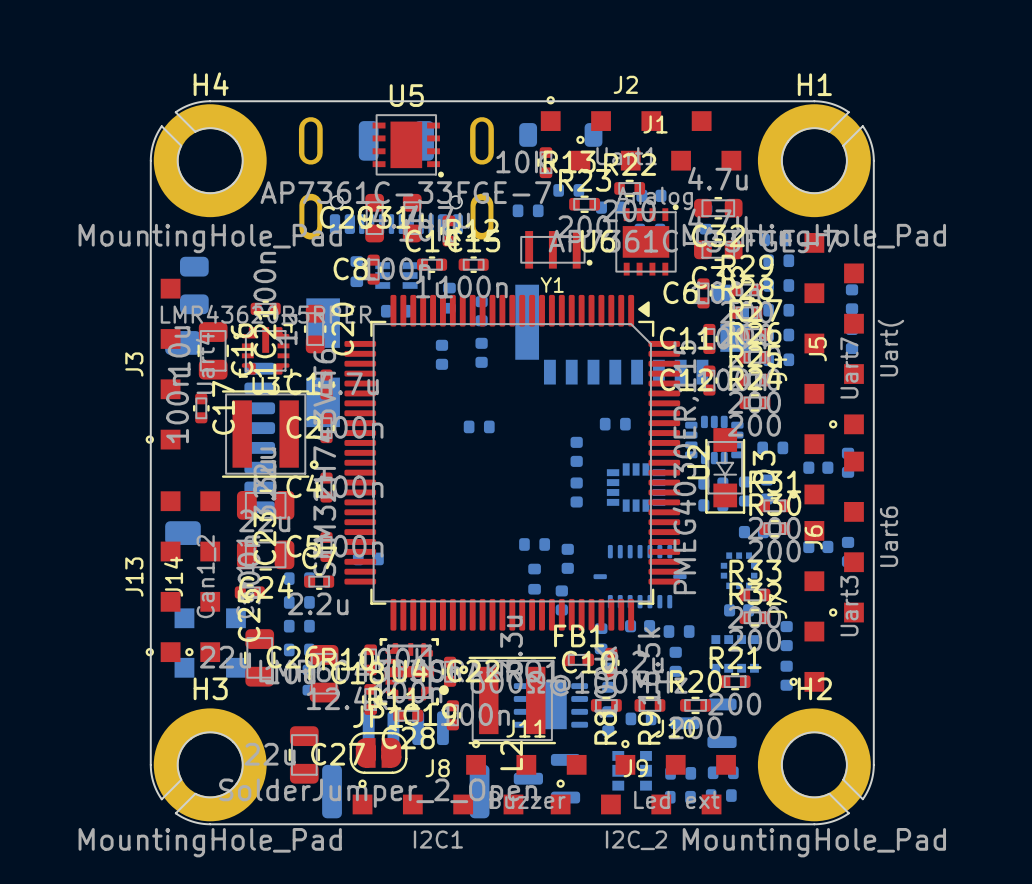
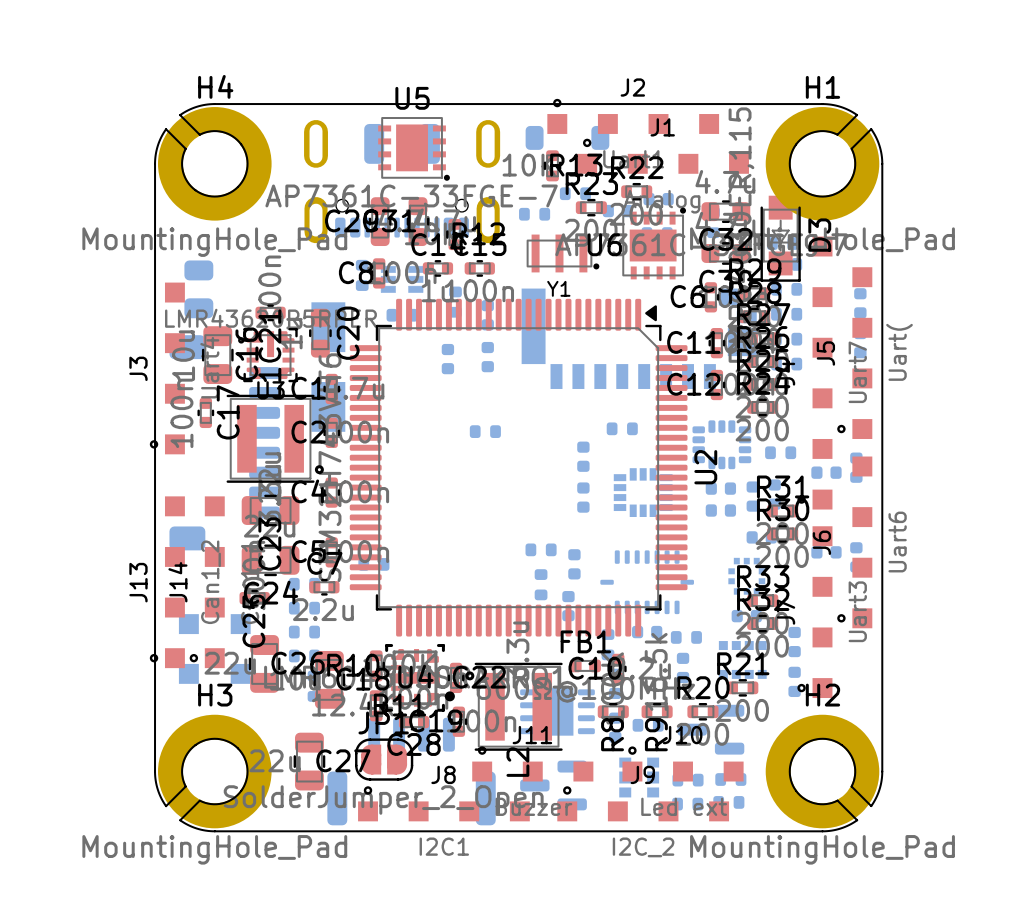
D3 position: (725, 470) -> (780, 238)

